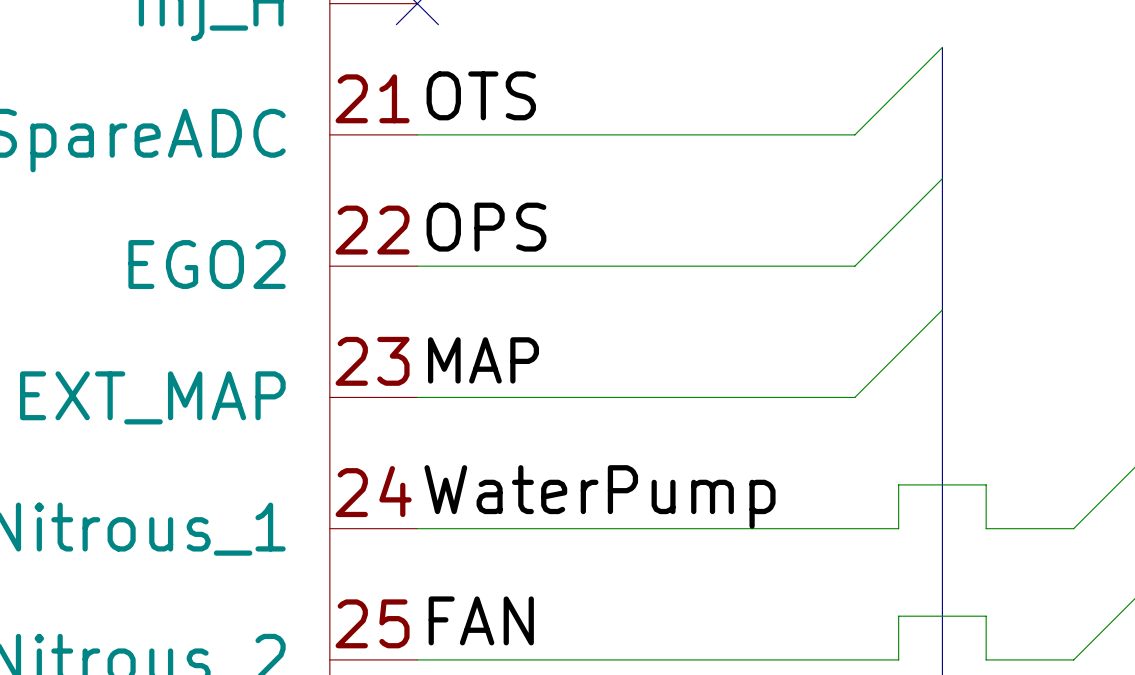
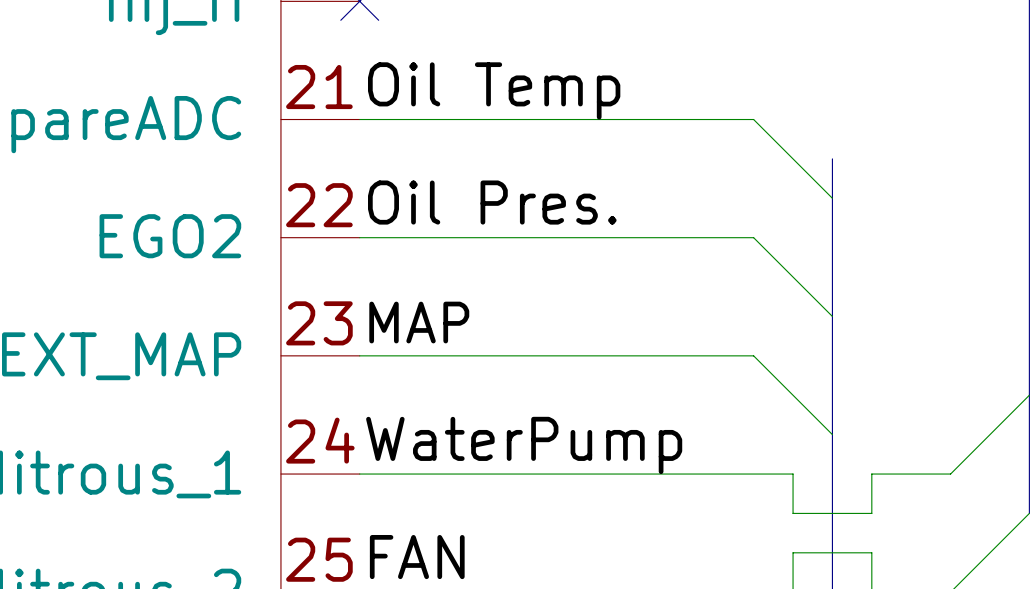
wire: (942, 47) (854, 134) -> (832, 198) (753, 119)
bus: (942, 47) (942, 178) -> none
label: OTS (481, 95) -> Oil Temp (494, 90)
wire: (942, 178) (854, 266) -> (832, 316) (753, 237)
label: OPS (486, 227) -> Oil Pres. (492, 202)
wire: (942, 309) (854, 397) -> (832, 434) (753, 355)
wire: (898, 528) (898, 484) (986, 484) (986, 528) -> (793, 474) (793, 513) (871, 513) (871, 474)

